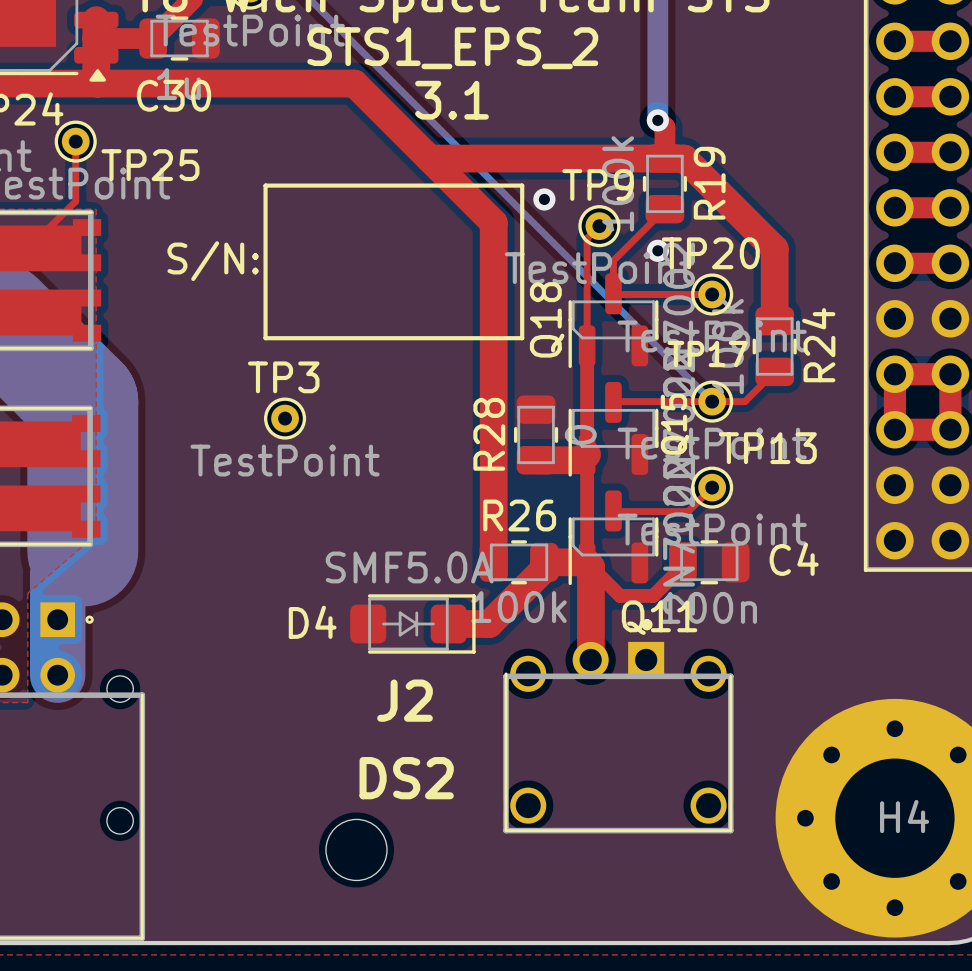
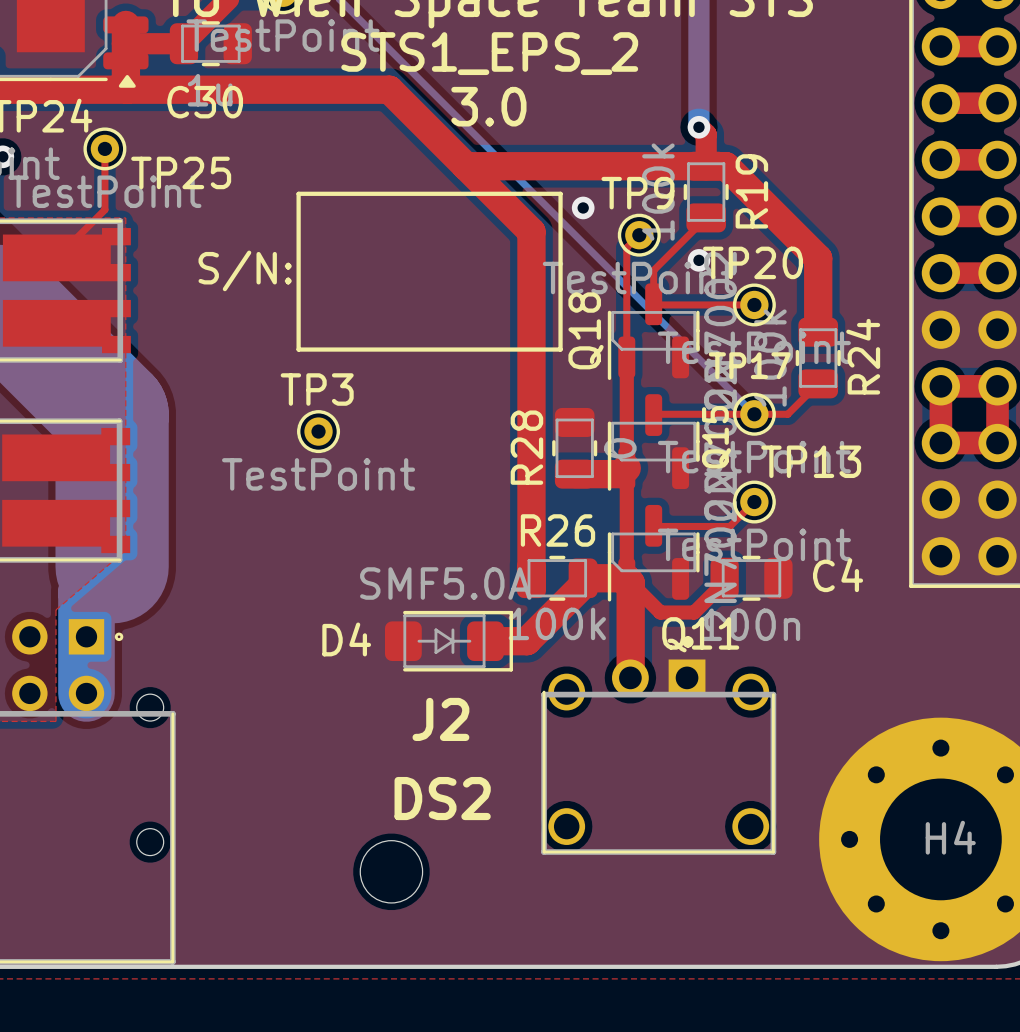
text: 3.1 (452, 100) -> 3.0 (488, 106)

